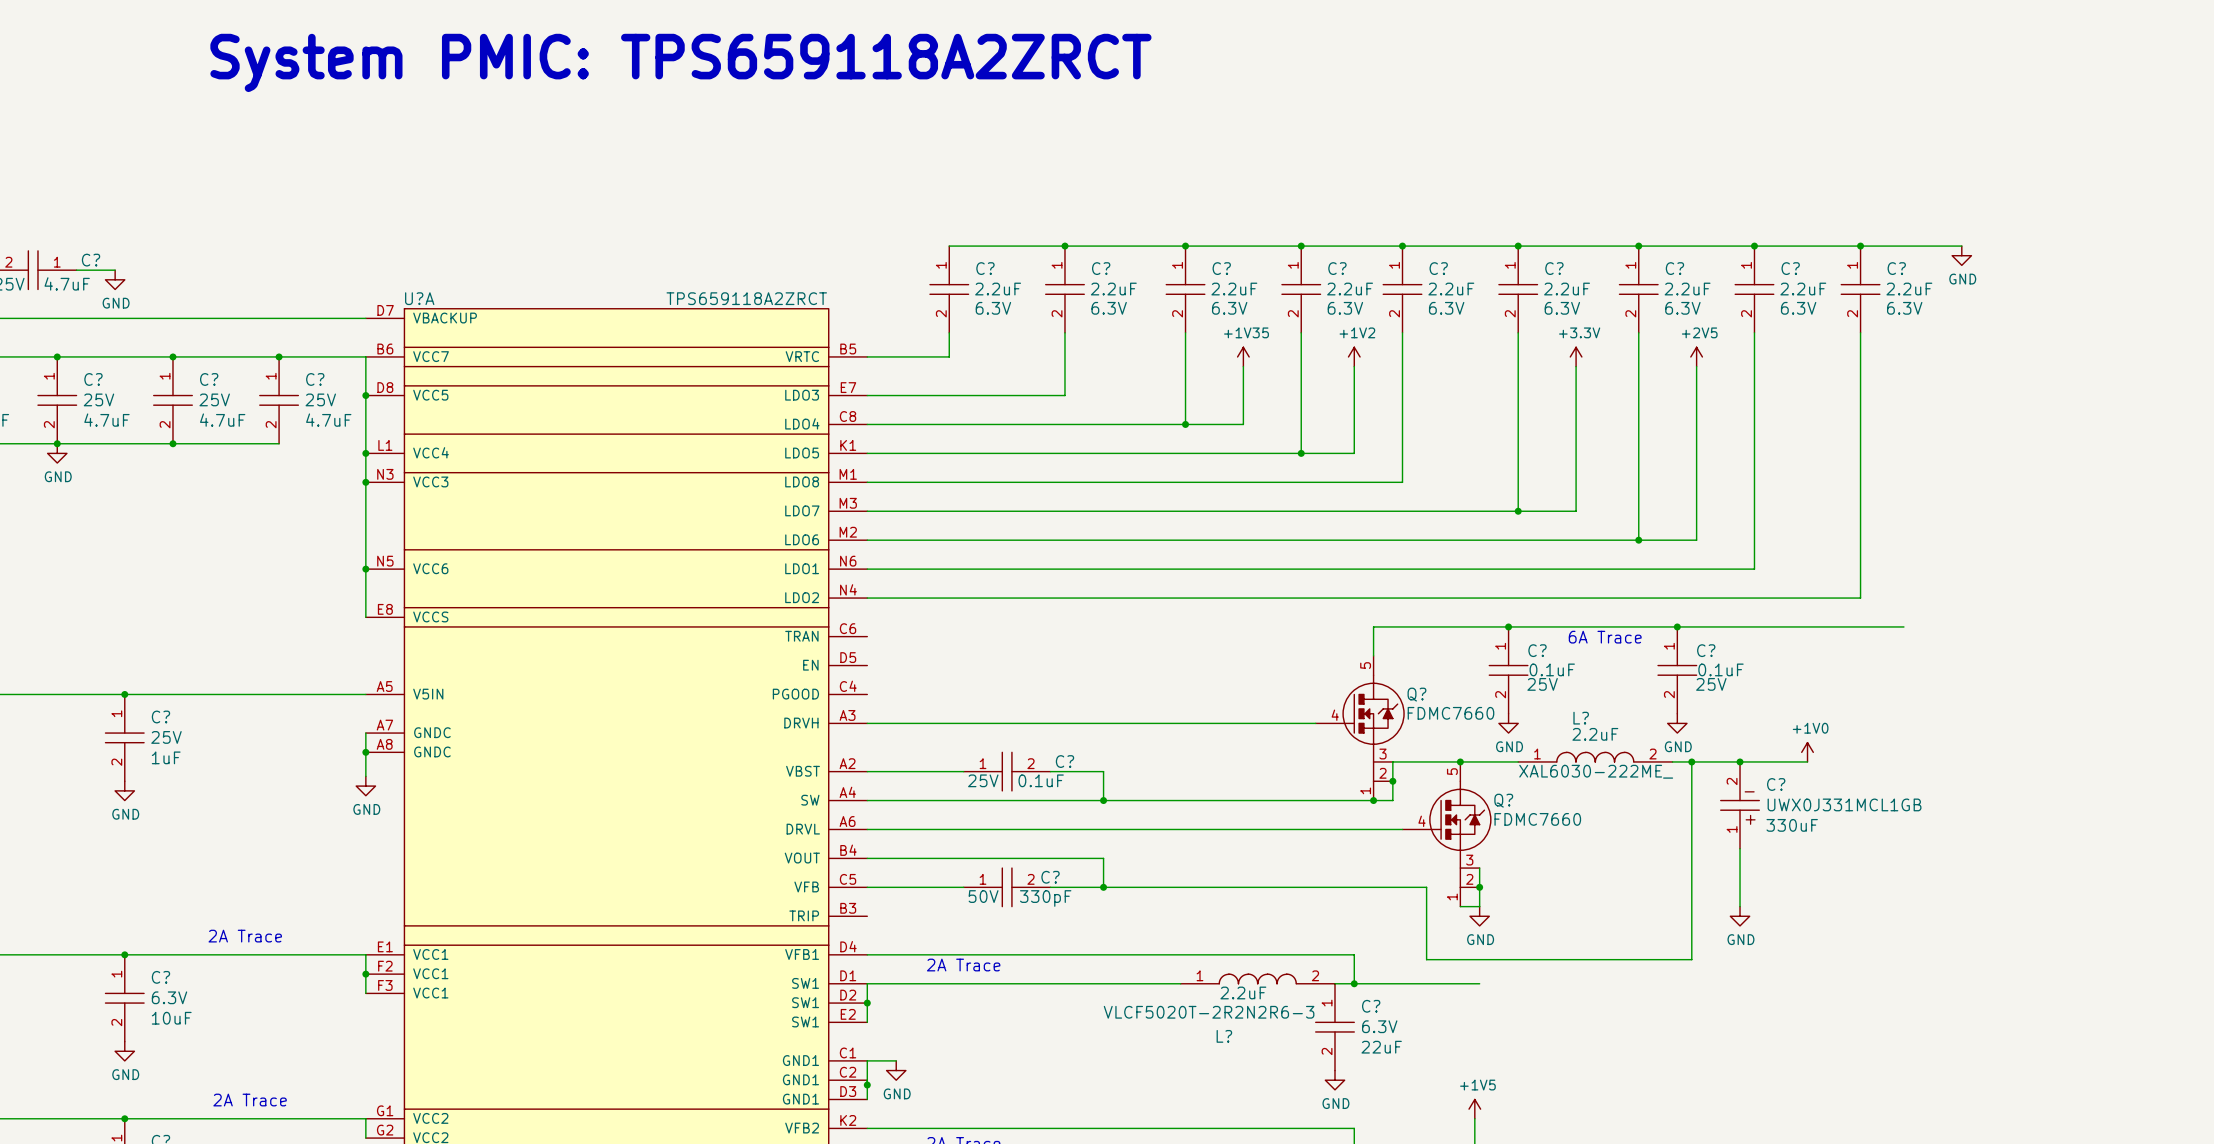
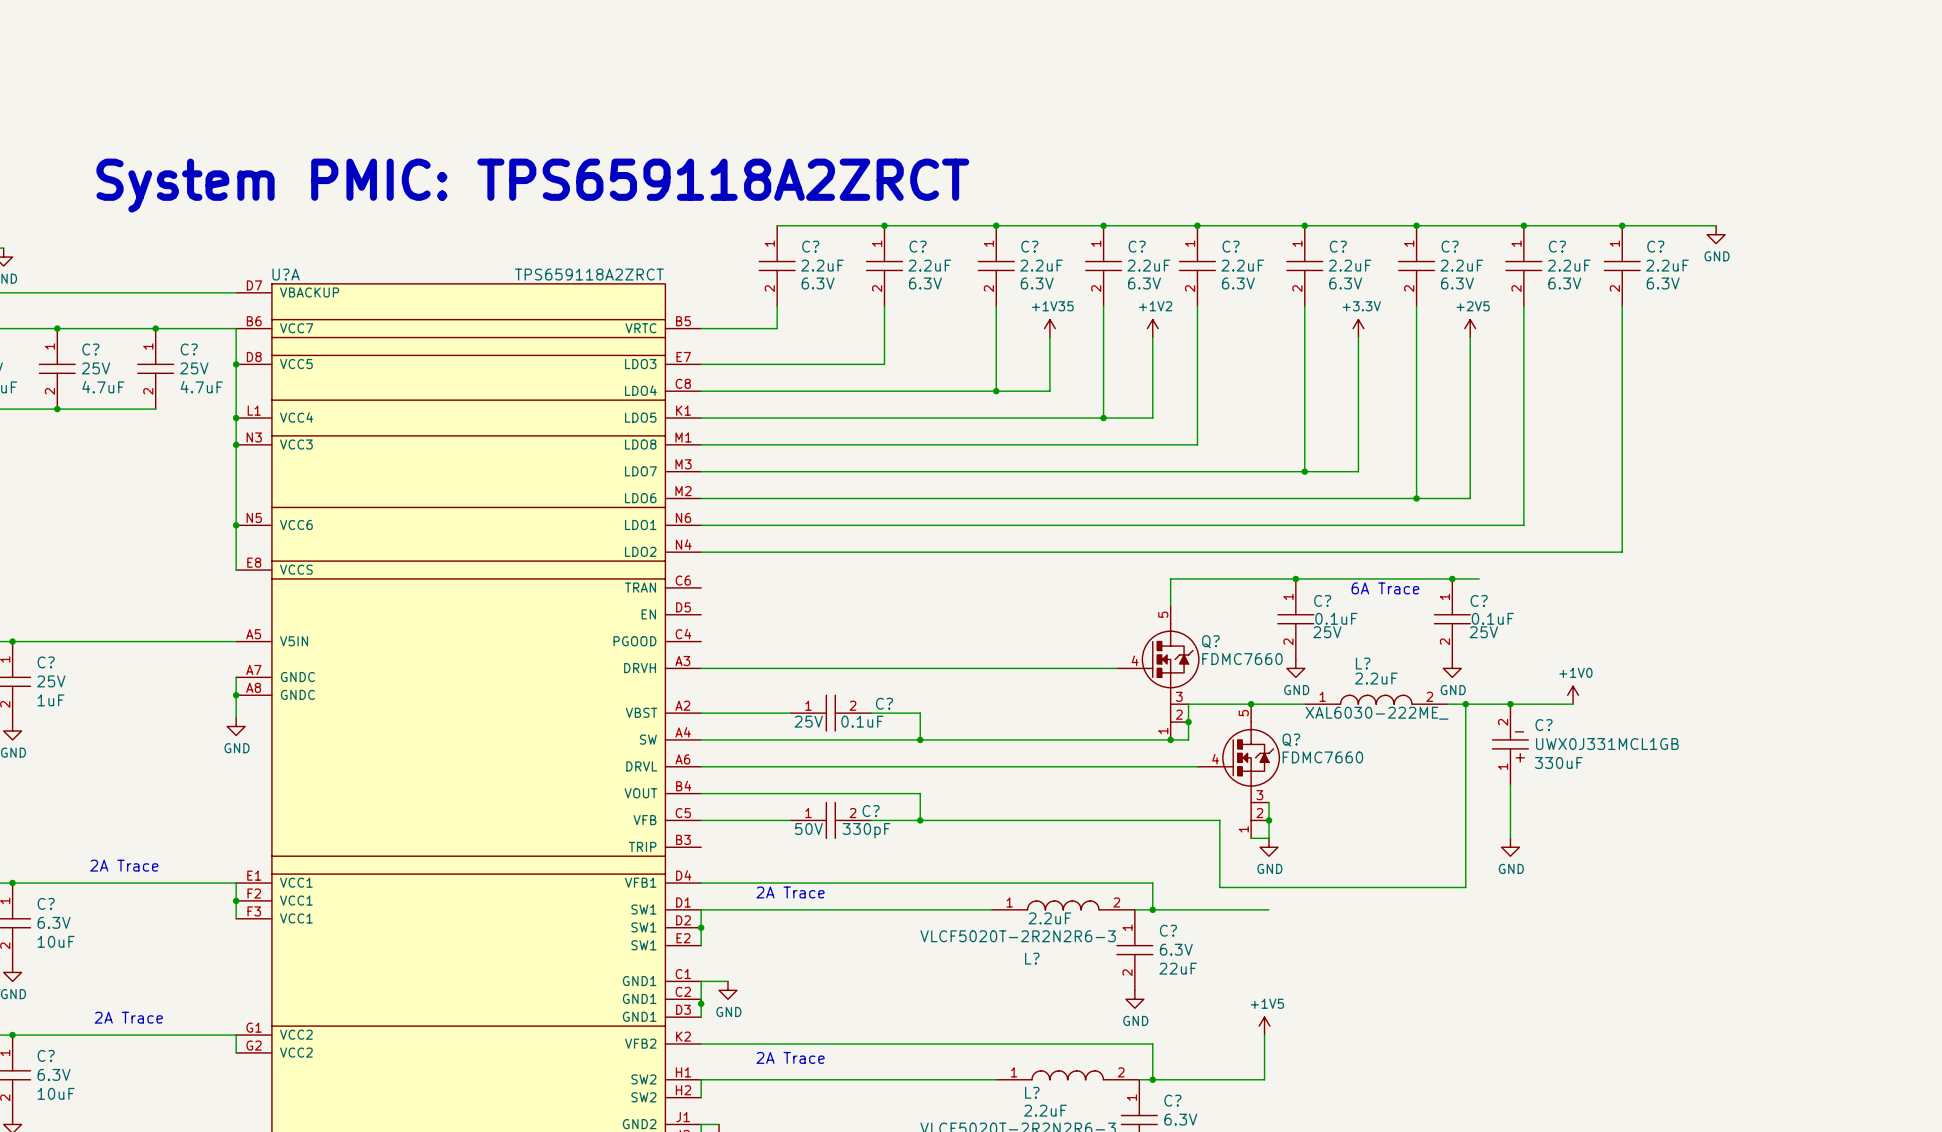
text position: System PMIC: TPS659118A2ZRCT (680, 62) -> System PMIC: TPS659118A2ZRCT (532, 185)
wire: (1706, 626) (1903, 626) -> none

